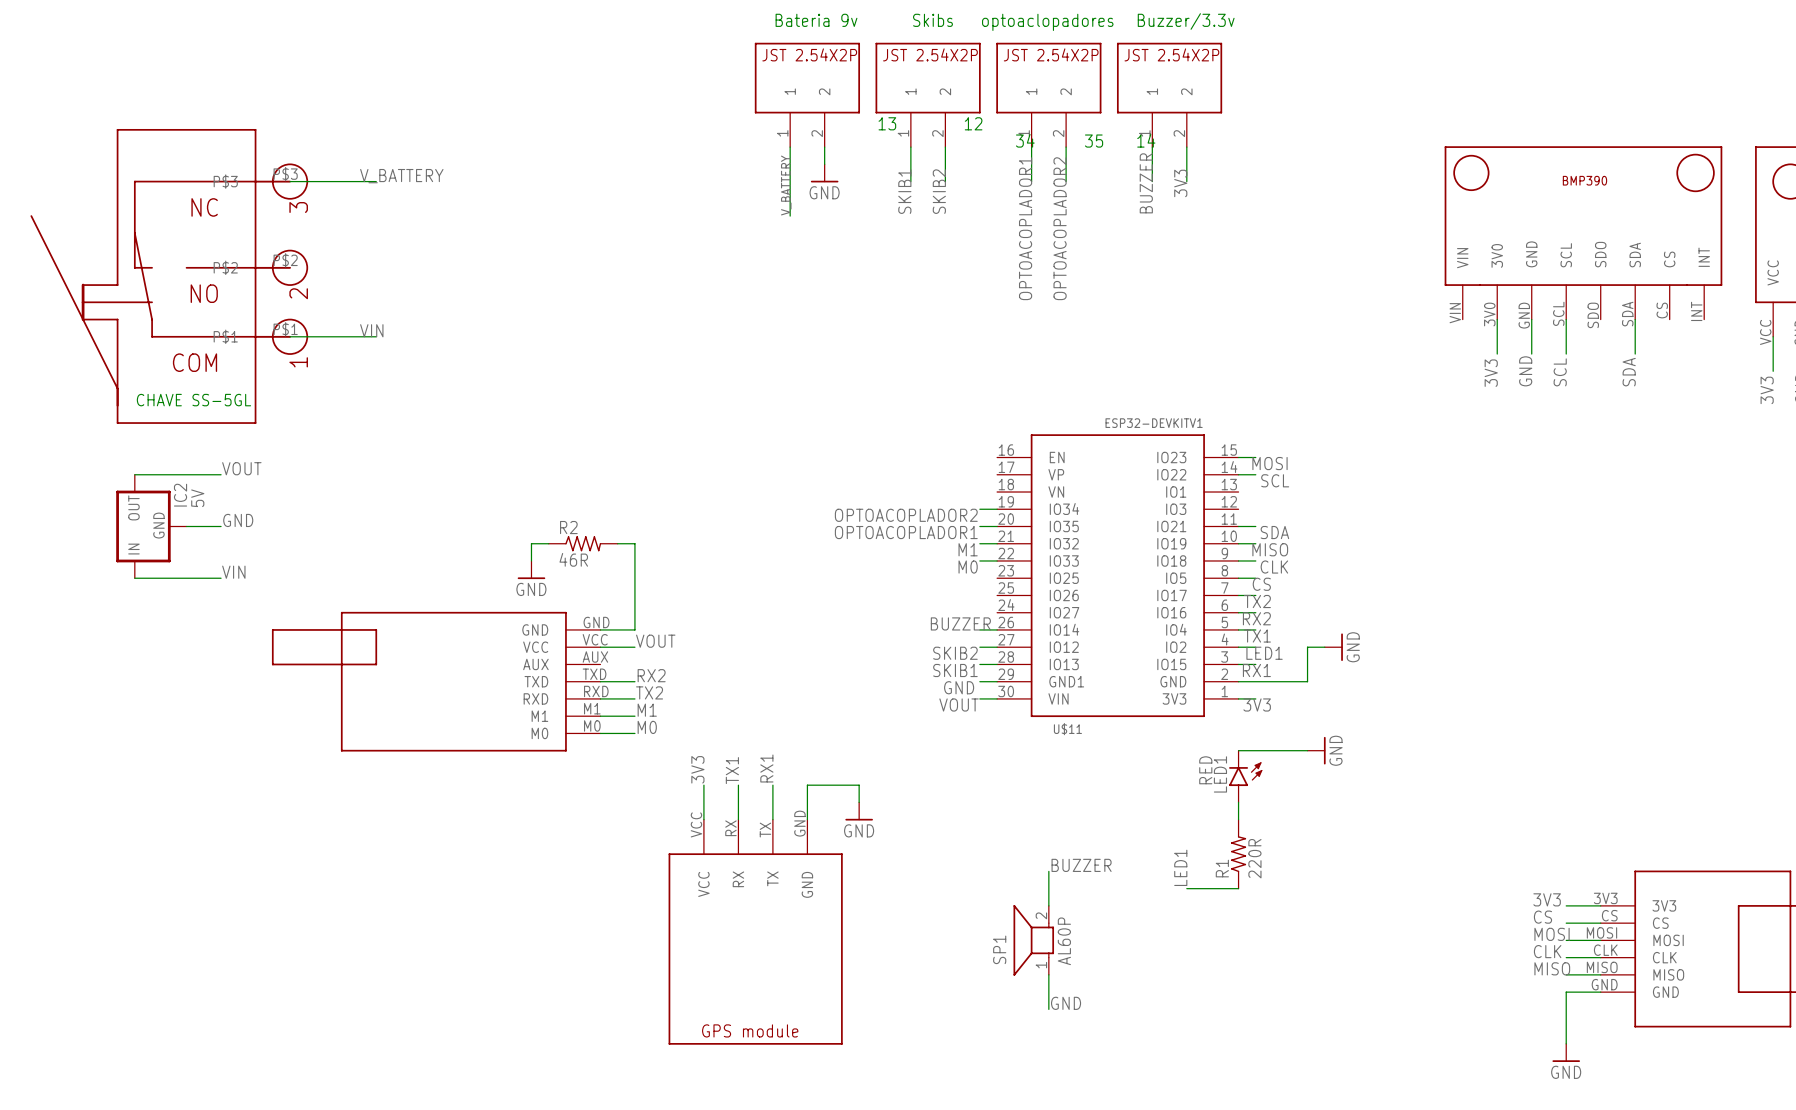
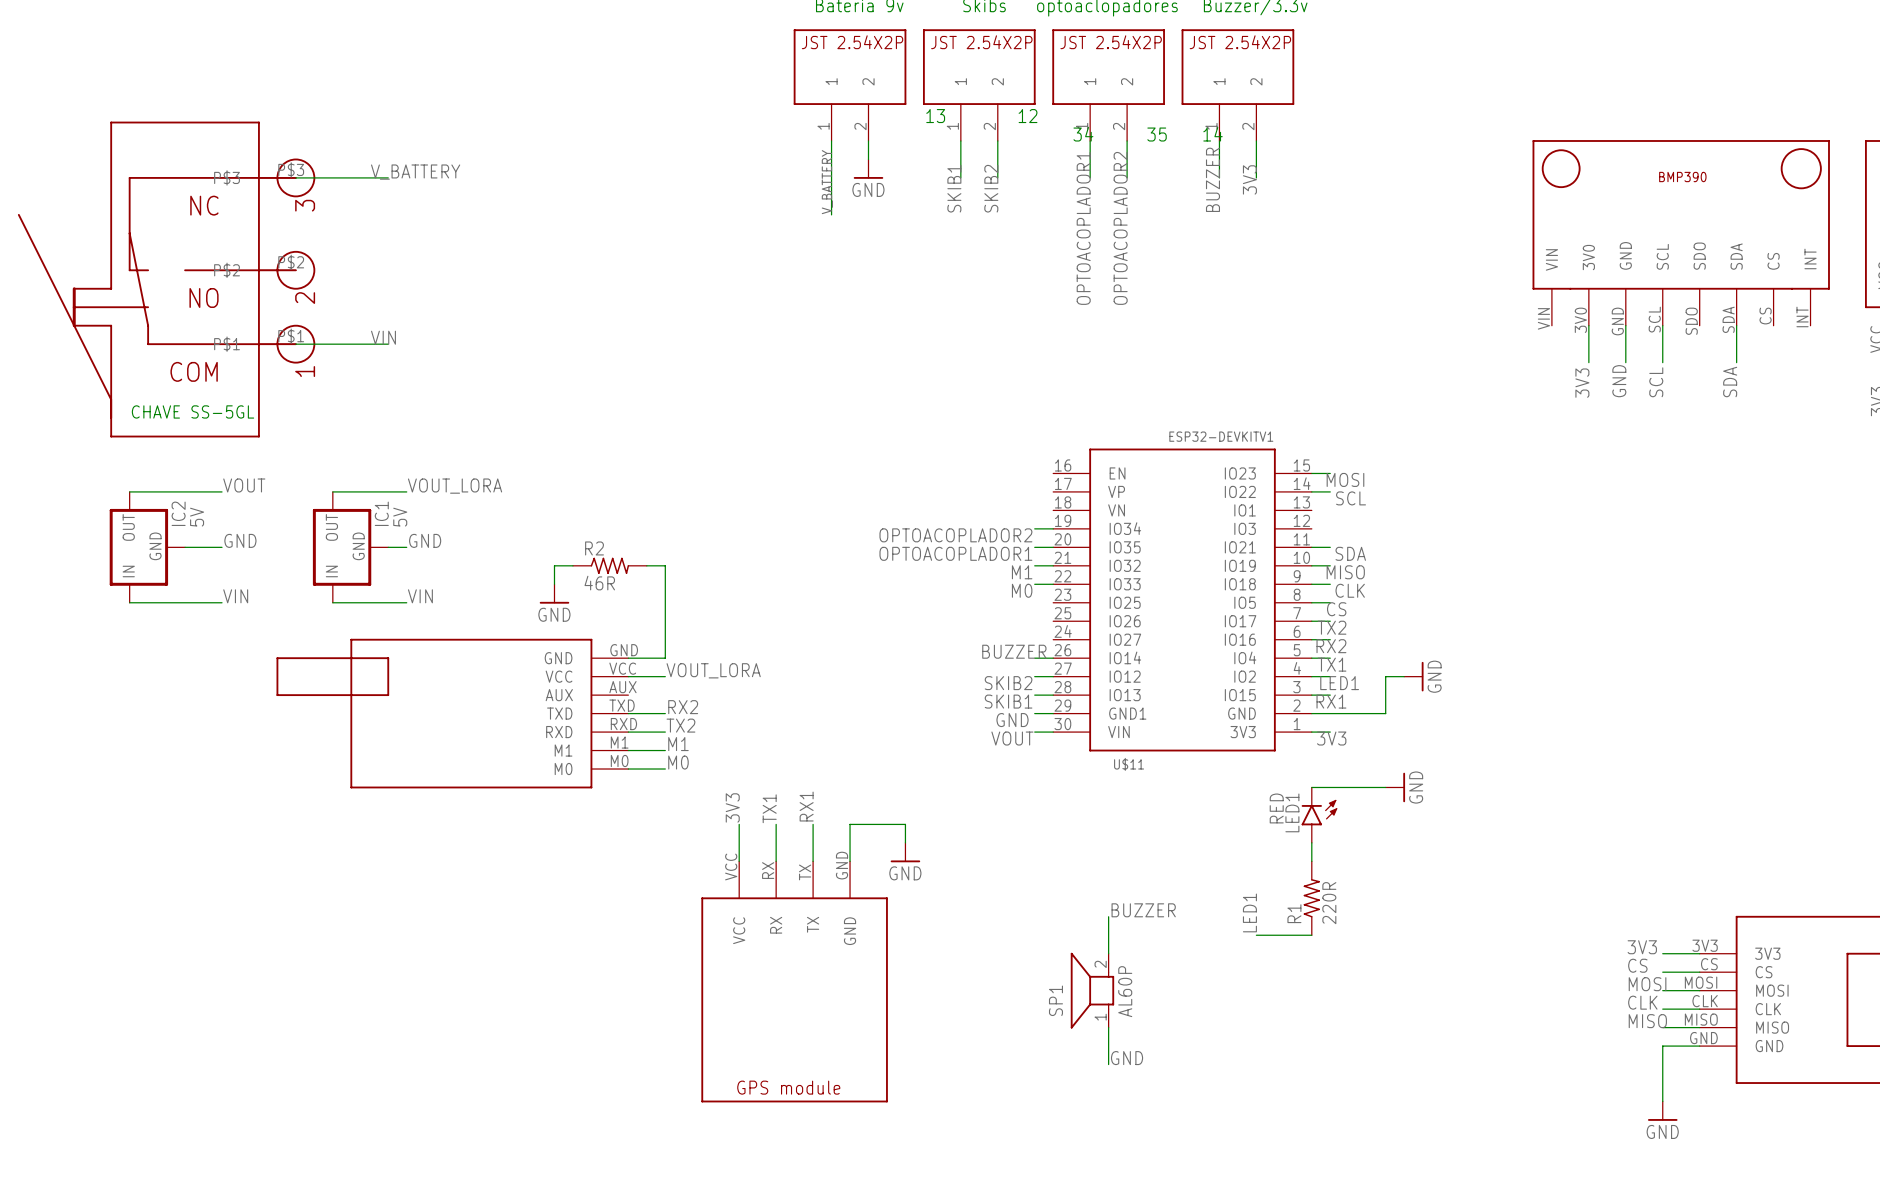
label: none -> VOUT_LORA (455, 486)
wire: none -> (332, 491) (406, 491)
label: none -> GND (425, 540)
IC1: none -> 5V (350, 547)
wire: none -> (388, 547) (406, 547)
label: none -> VIN (420, 596)
wire: none -> (332, 602) (406, 602)
label: VOUT (655, 641) -> VOUT_LORA (713, 670)

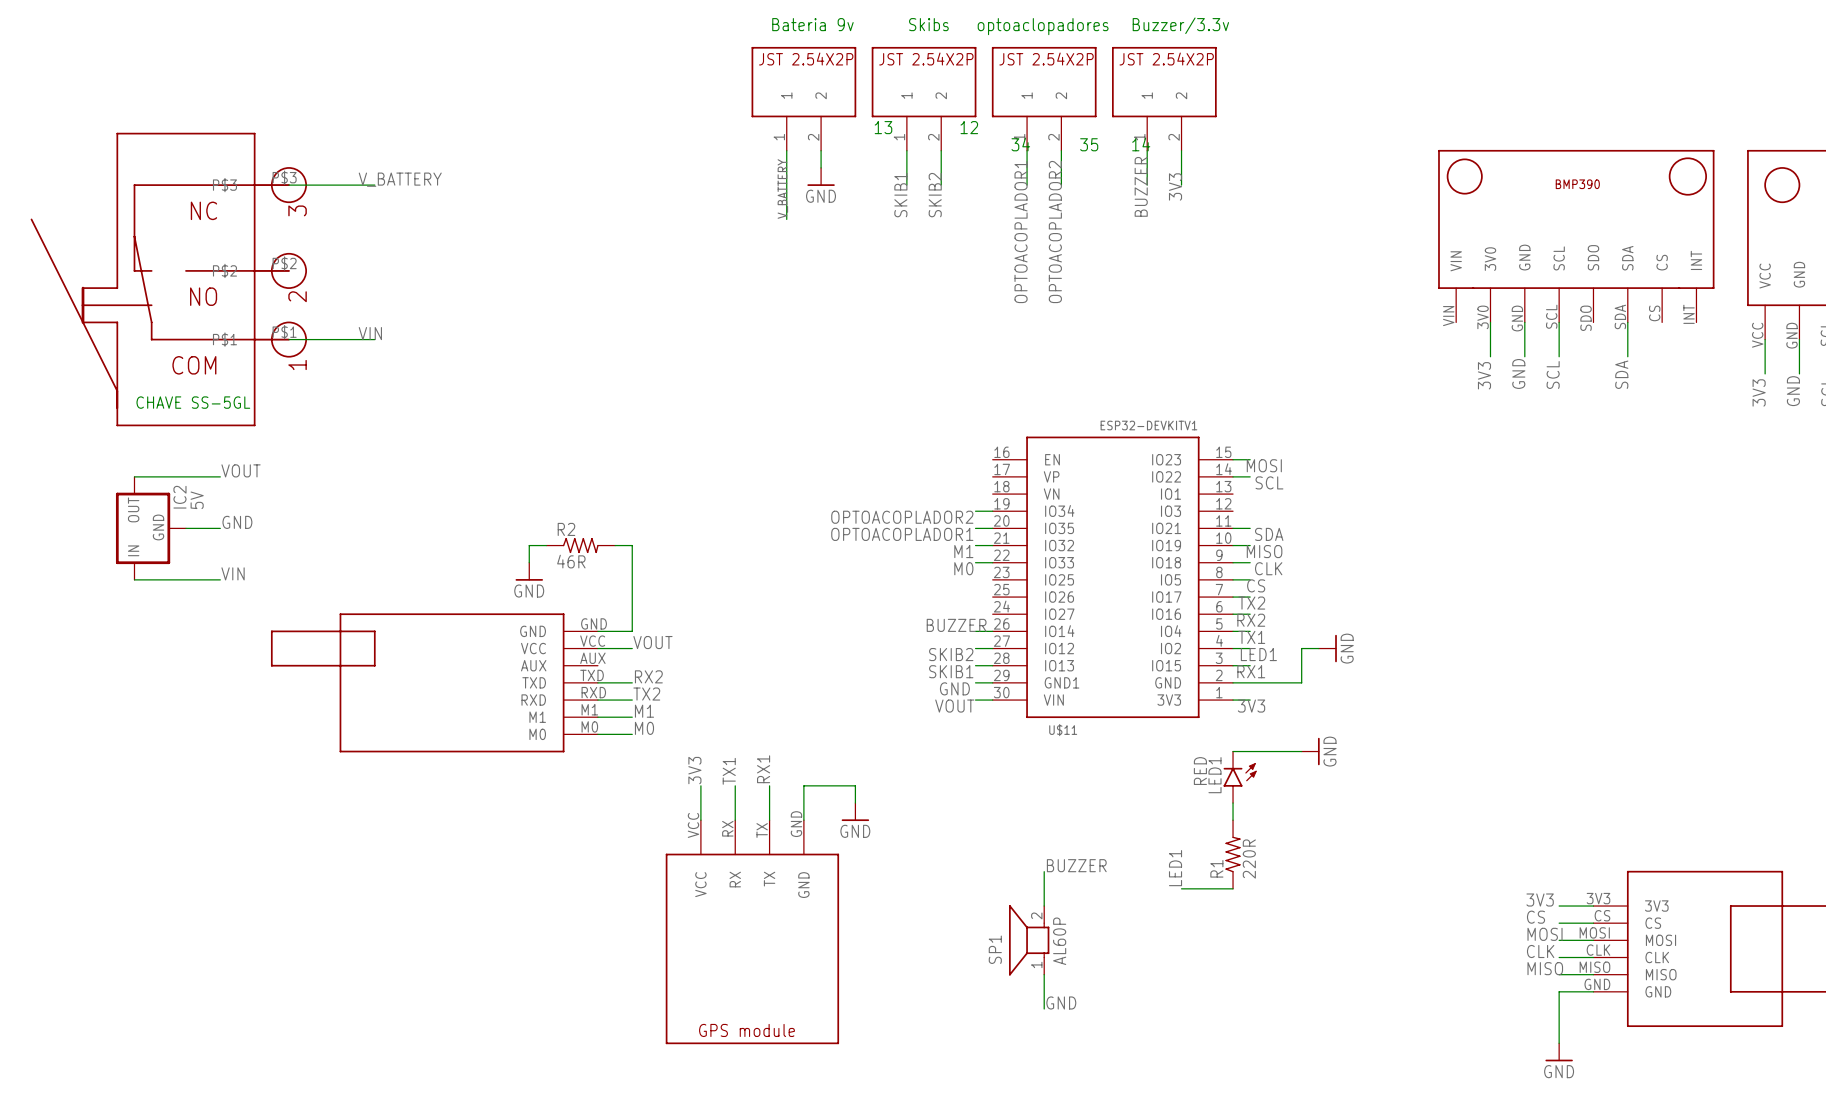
label: VOUT_LORA (455, 486) -> none
wire: (332, 491) (406, 491) -> none
label: GND (425, 540) -> none
IC1: 5V (350, 547) -> none
wire: (388, 547) (406, 547) -> none
label: VIN (420, 596) -> none
wire: (332, 602) (406, 602) -> none
label: VOUT_LORA (713, 670) -> VOUT (652, 642)

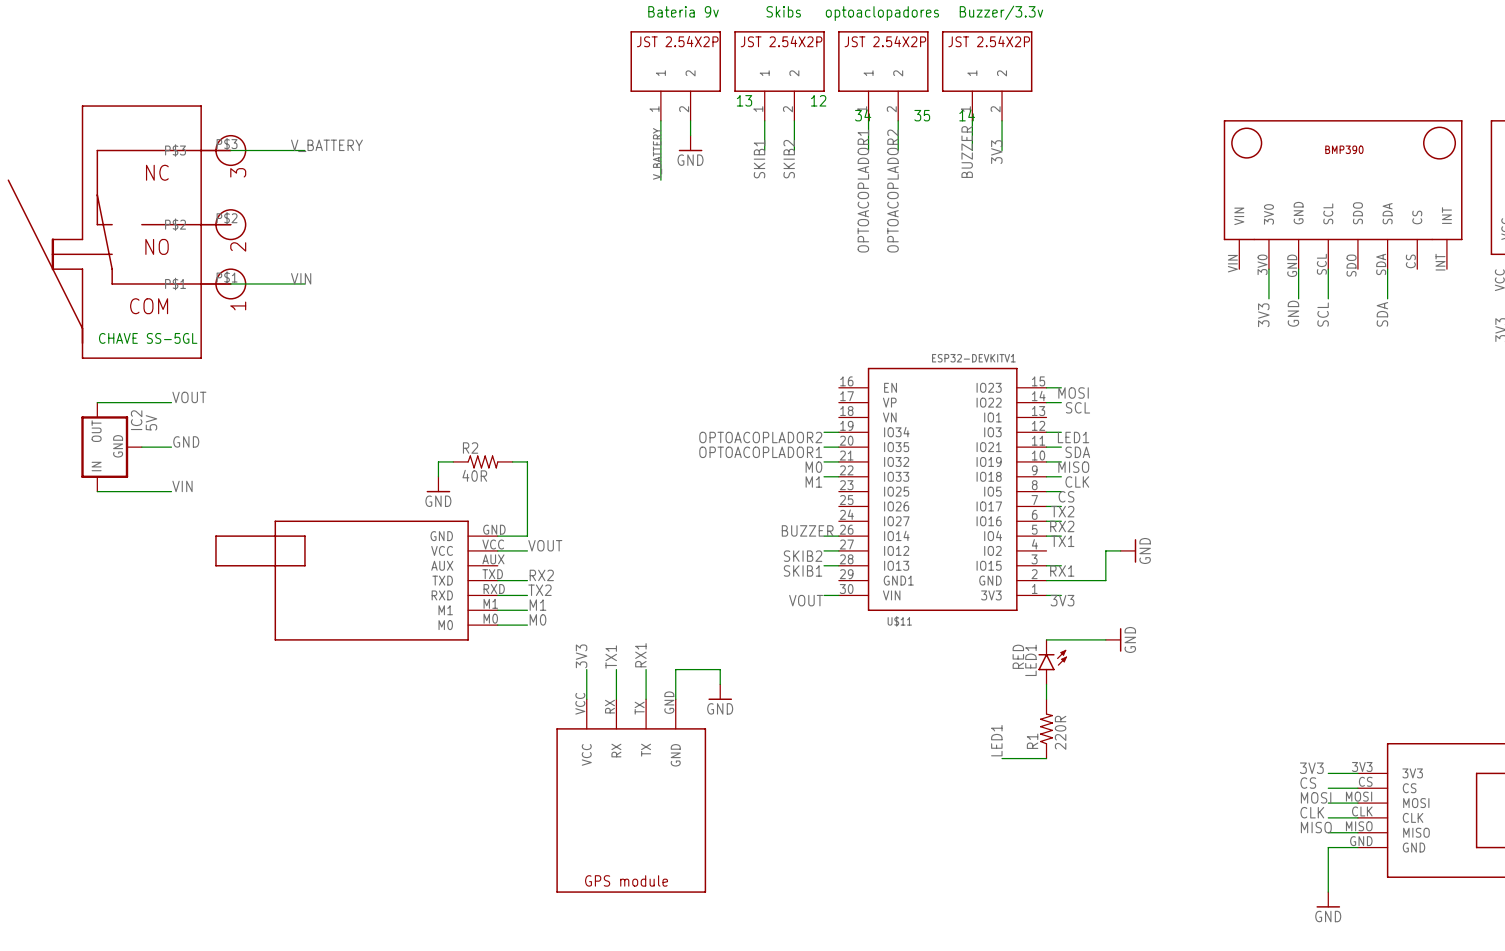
label: M1 (963, 551) -> M0 (813, 467)
R2 value: 46R (571, 561) -> 40R (474, 475)
label: M0 (963, 568) -> M1 (813, 481)
wire: (1233, 648) (1250, 648) -> (1046, 432) (1061, 432)
label position: LED1 (1258, 654) -> LED1 (1073, 437)
wire: (975, 682) (992, 682) -> none
label: GND (954, 688) -> none
label: BUZZER (1076, 865) -> none
wire: (1044, 871) (1044, 906) -> none
SP1: AL60P (1029, 940) -> none
wire: (1044, 974) (1044, 1009) -> none
label: GND (1061, 1002) -> none

